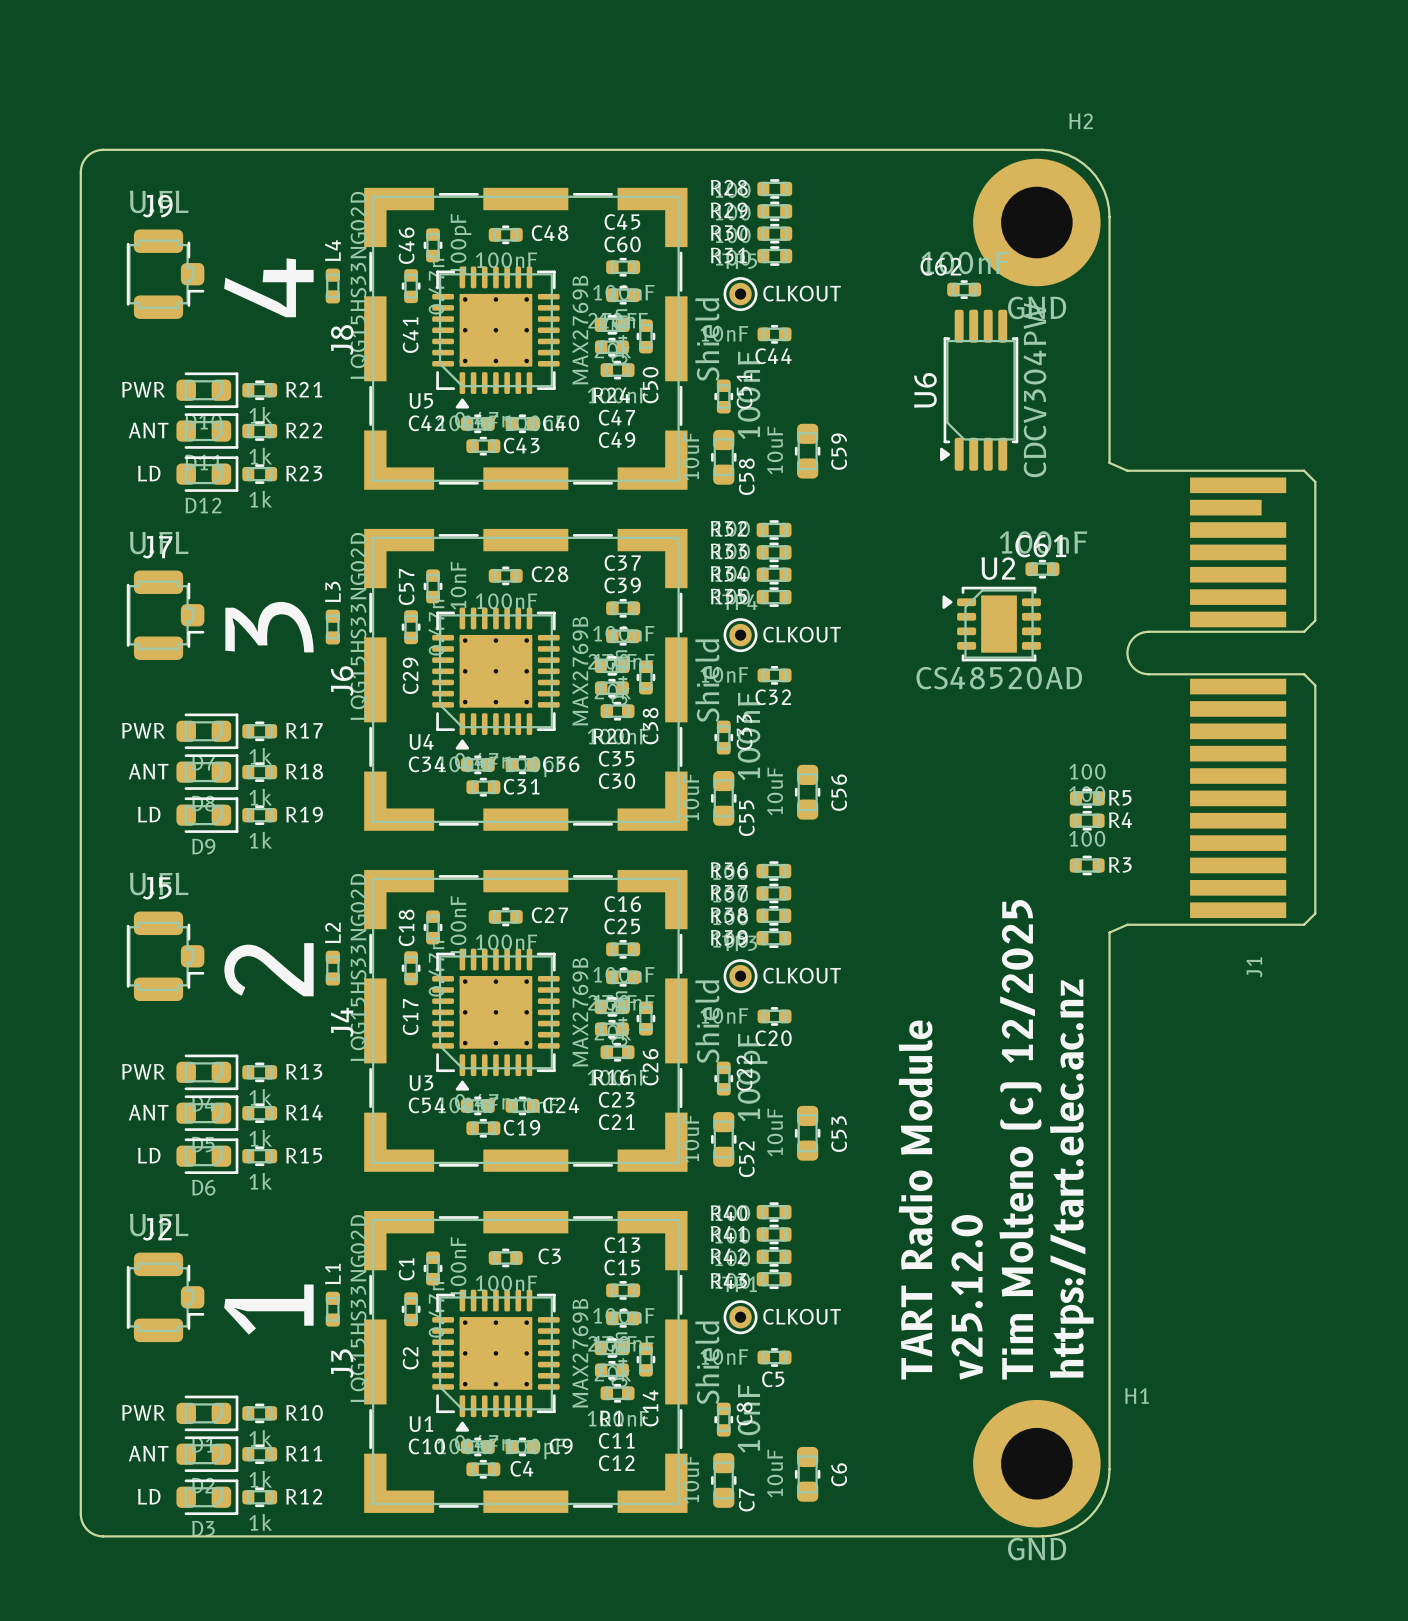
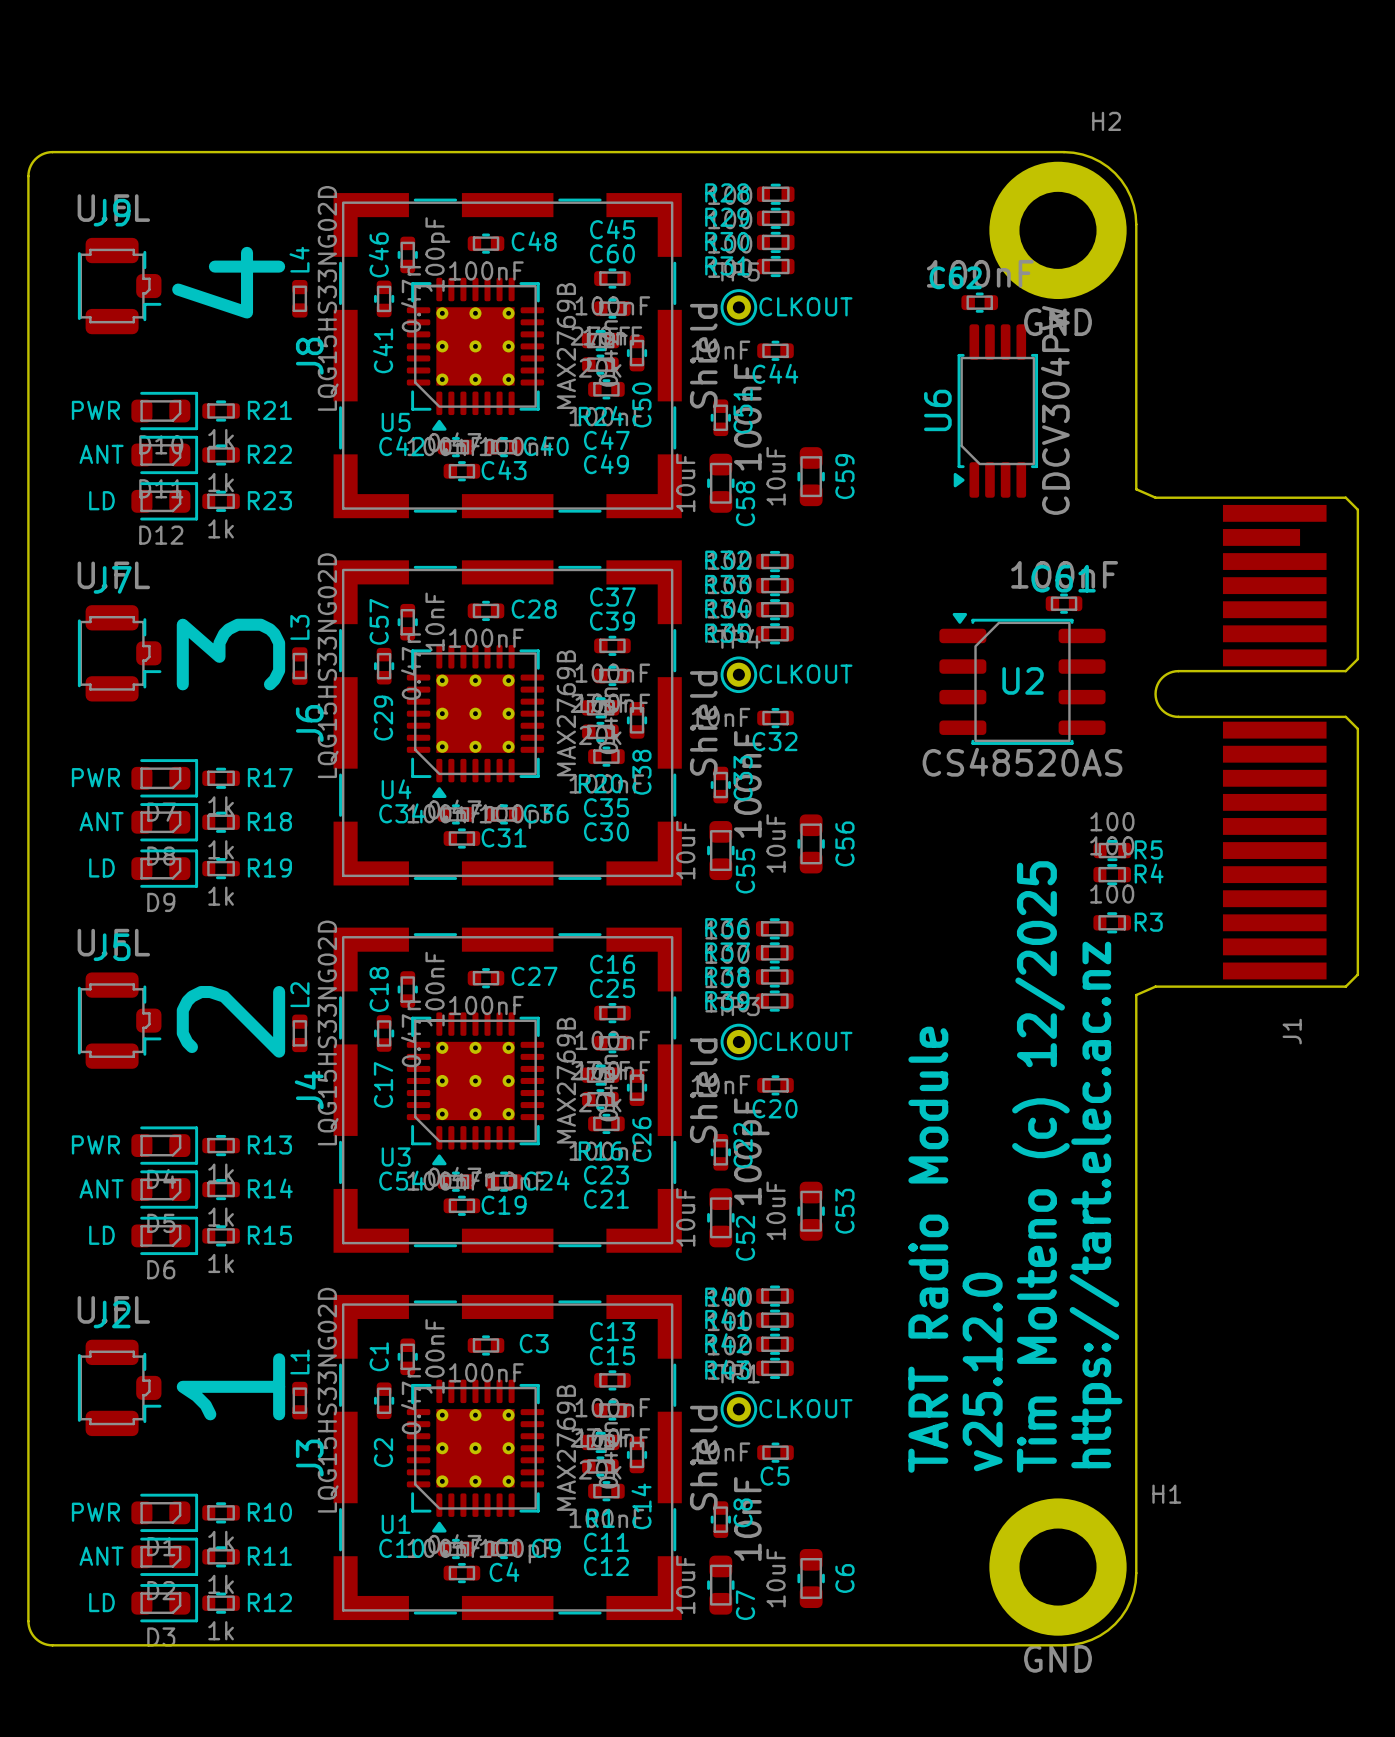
U2 name position: U2 (998, 568) -> U2 (1023, 680)
U2 footprint: [942, 586, 1041, 662] -> [939, 612, 1106, 745]
U2 value: CS48520AD (999, 678) -> CS48520AS (1022, 762)

